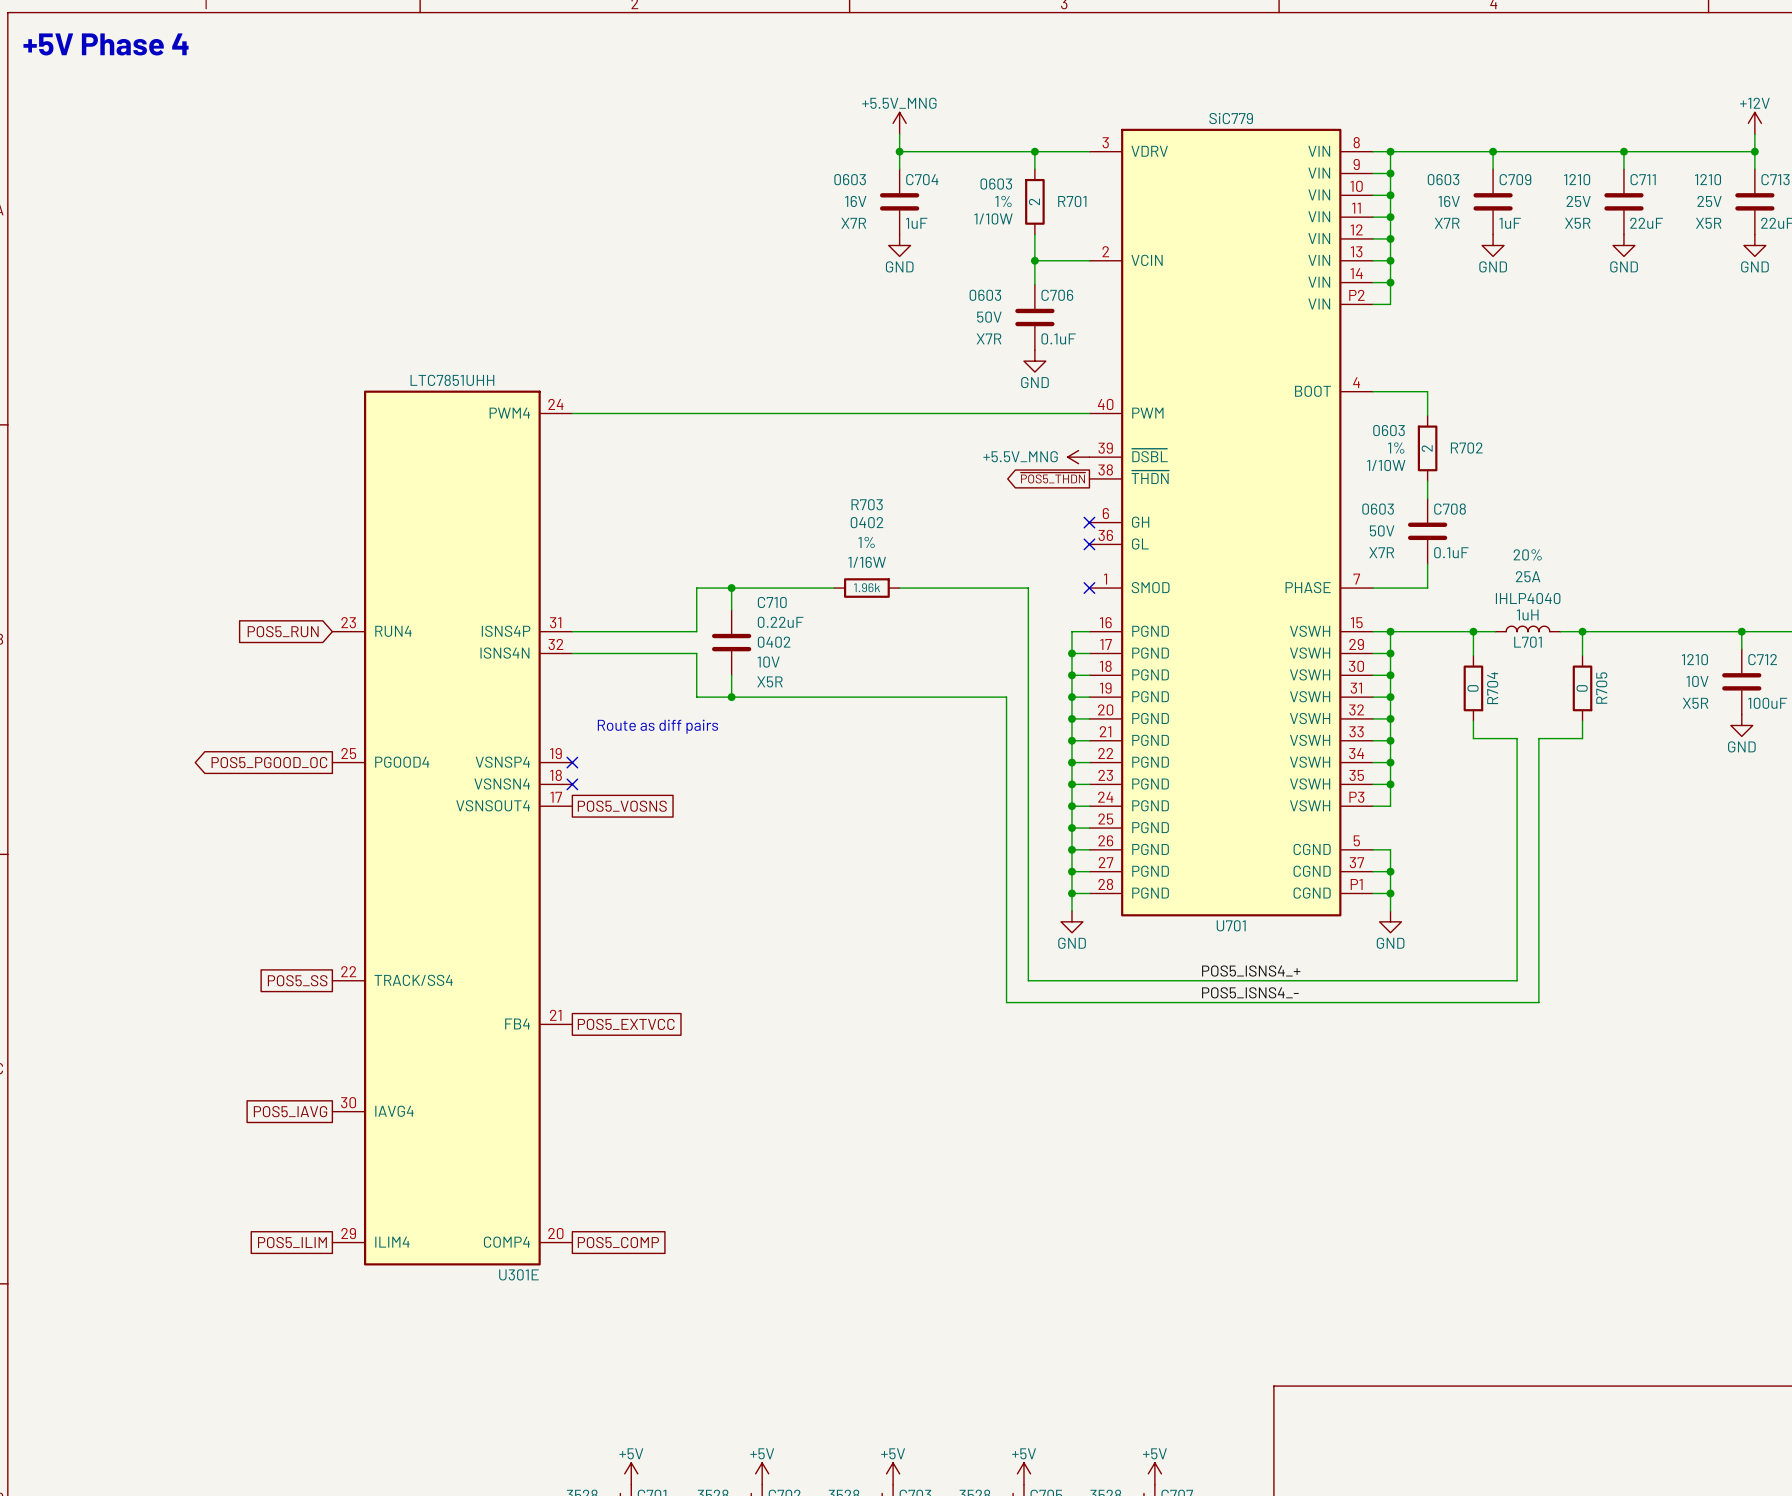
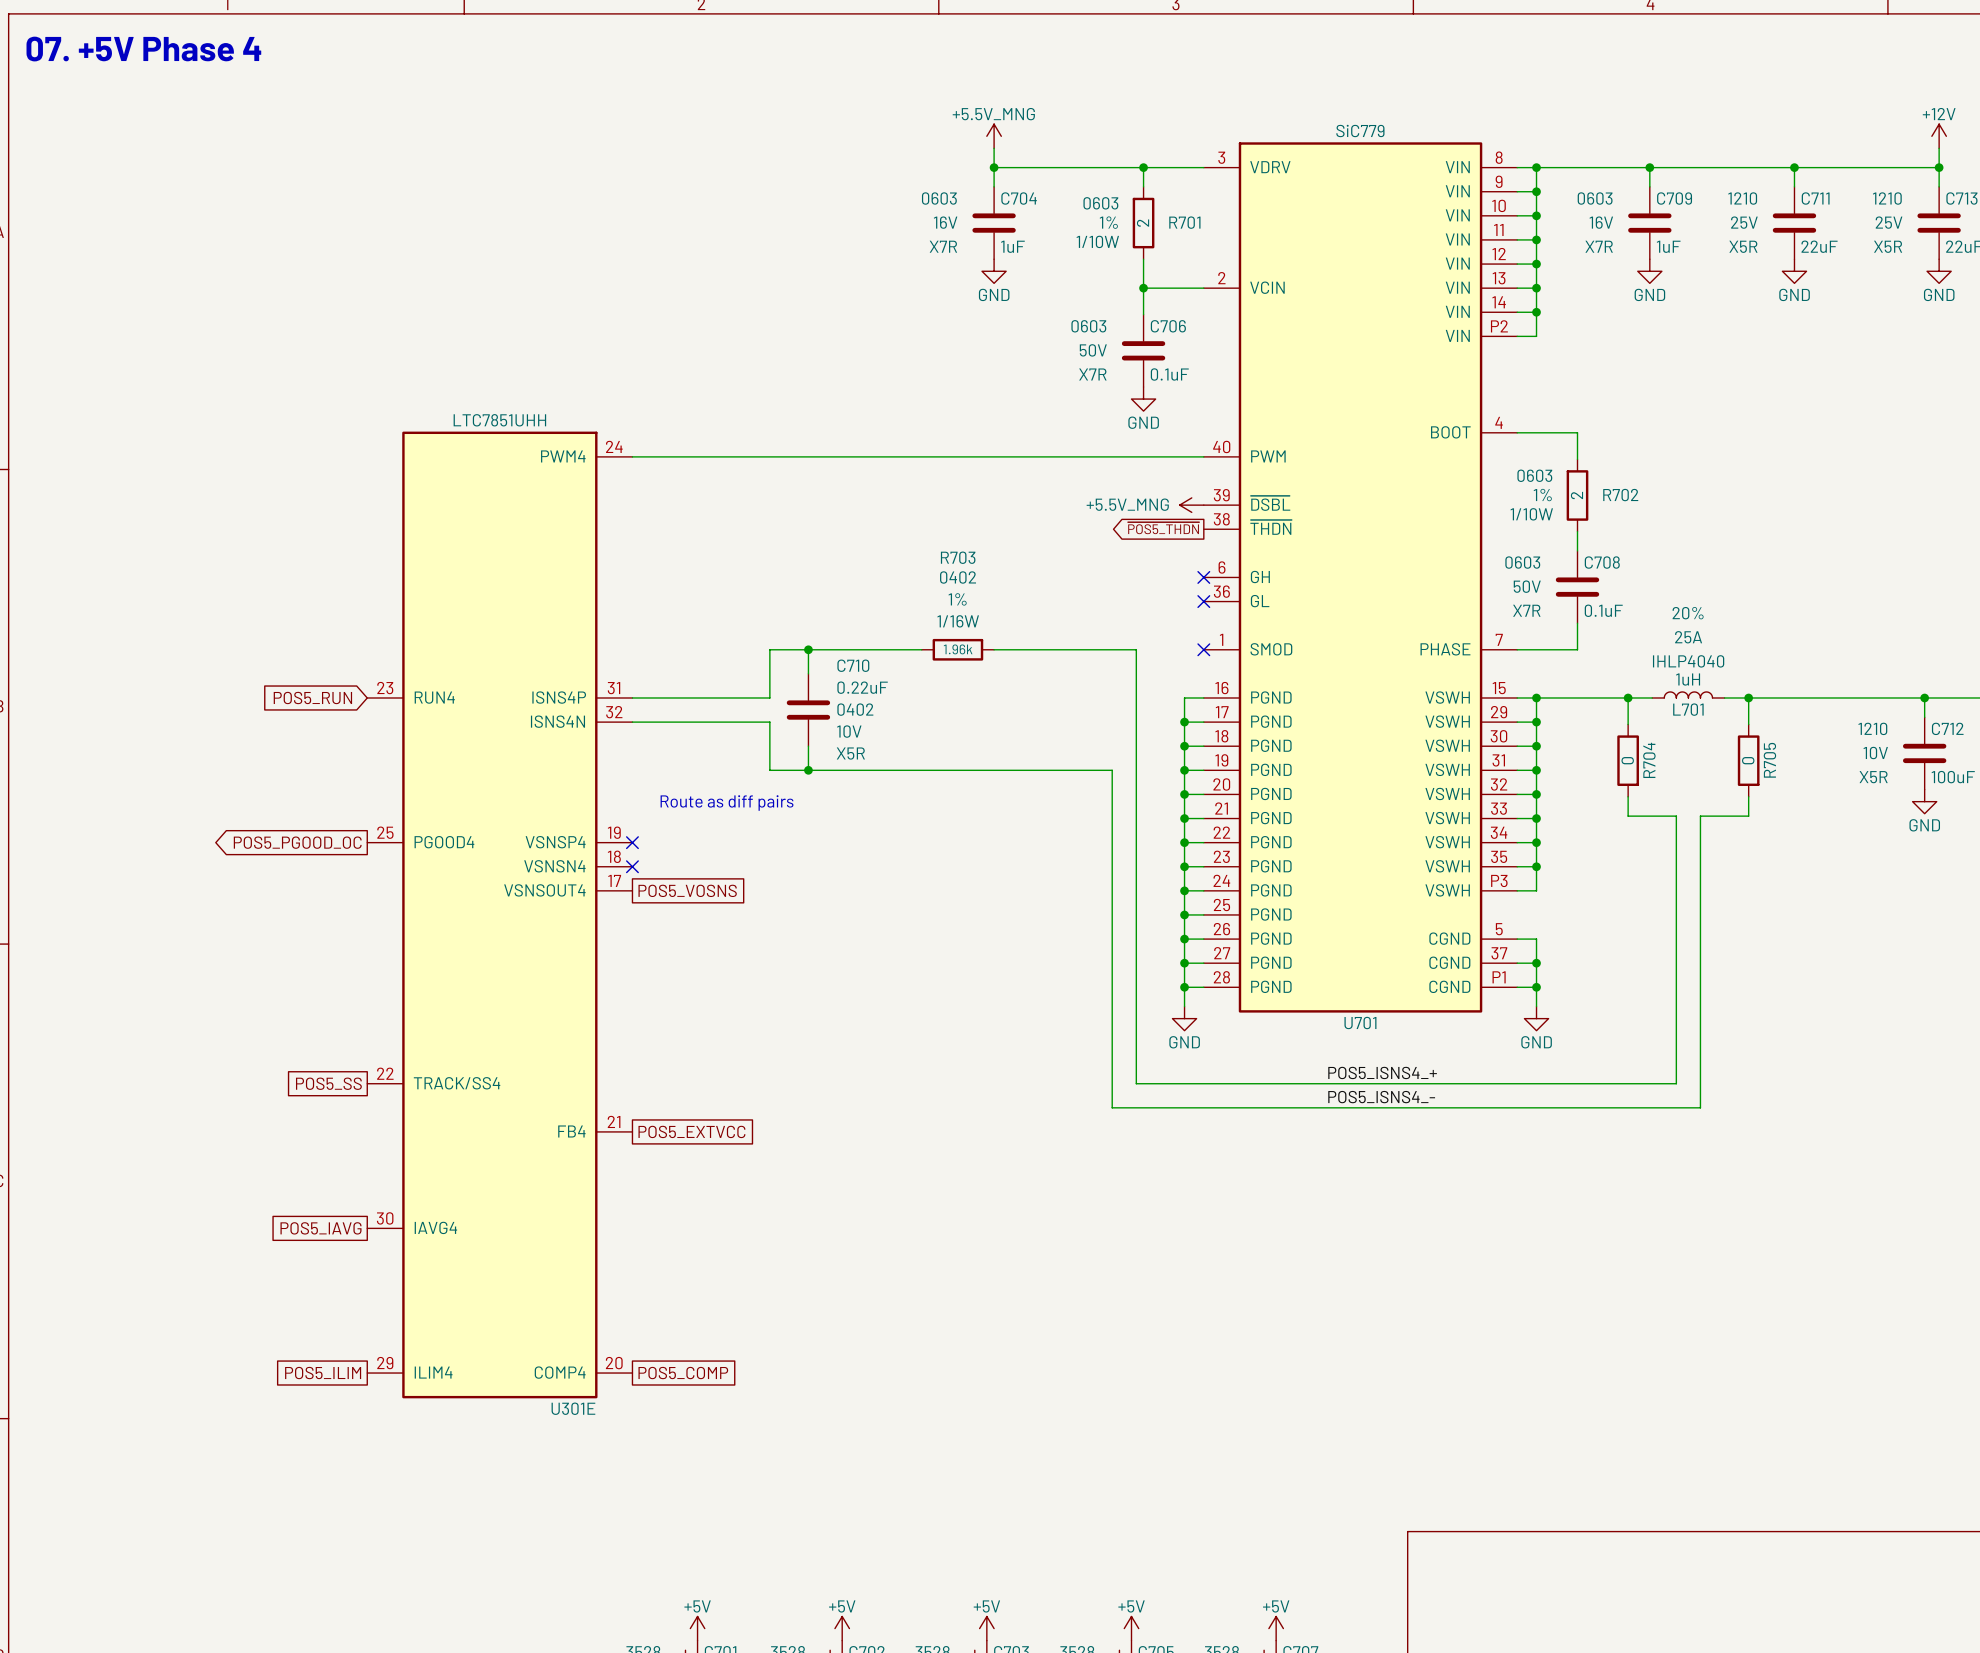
text: +5V Phase 4 (106, 44) -> 07. +5V Phase 4 (143, 49)

